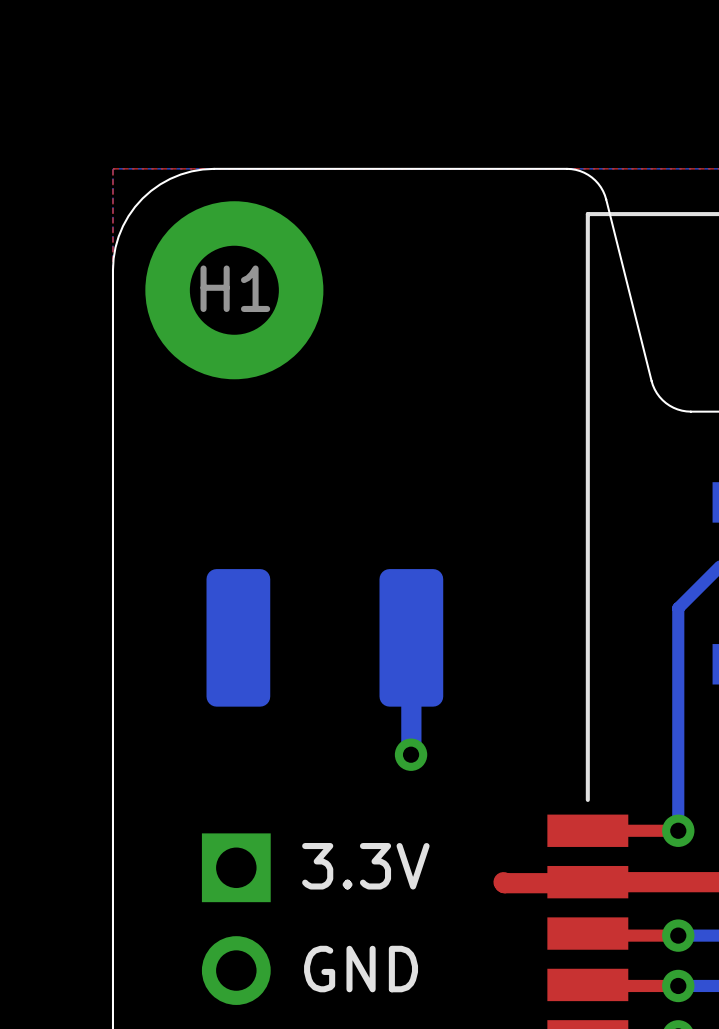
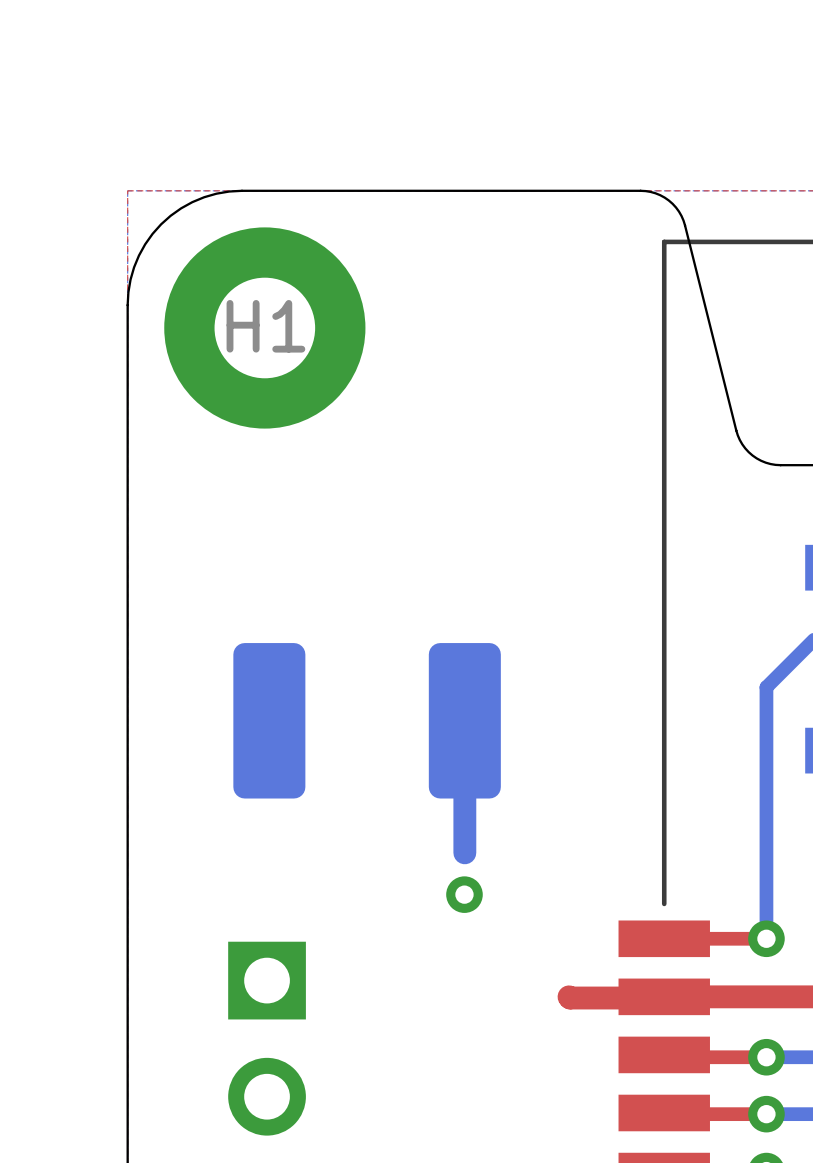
via position: (411, 754) -> (464, 894)
text: 3.3V (365, 866) -> none
text: GND (361, 969) -> none

